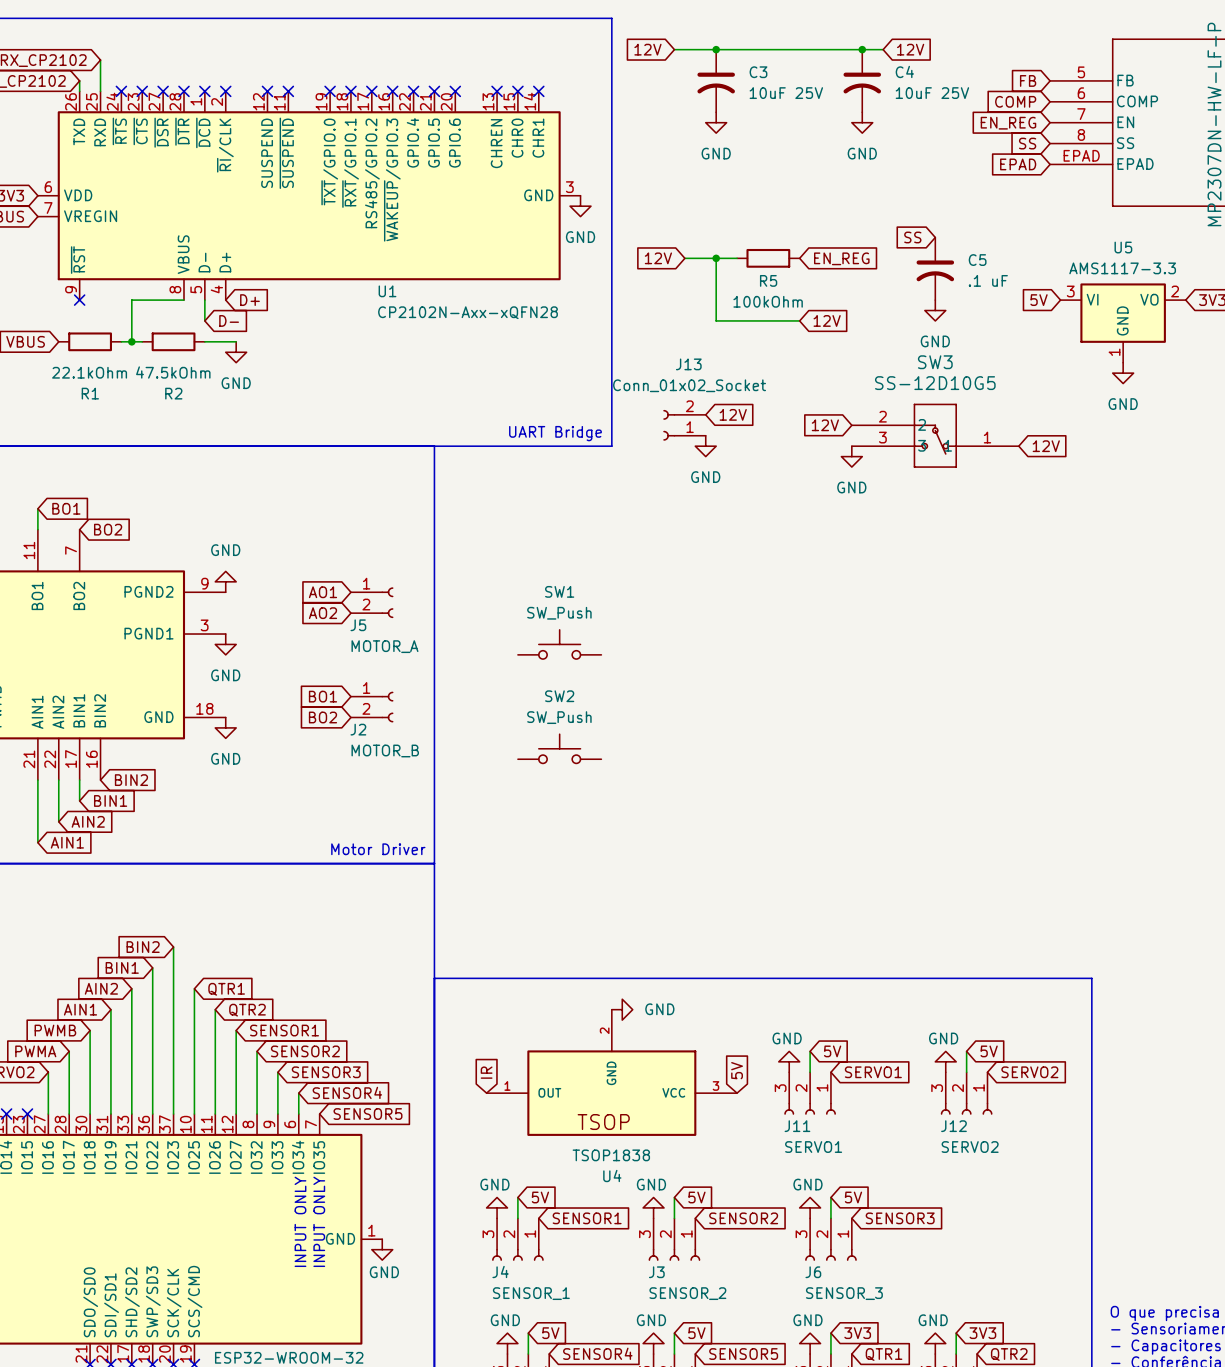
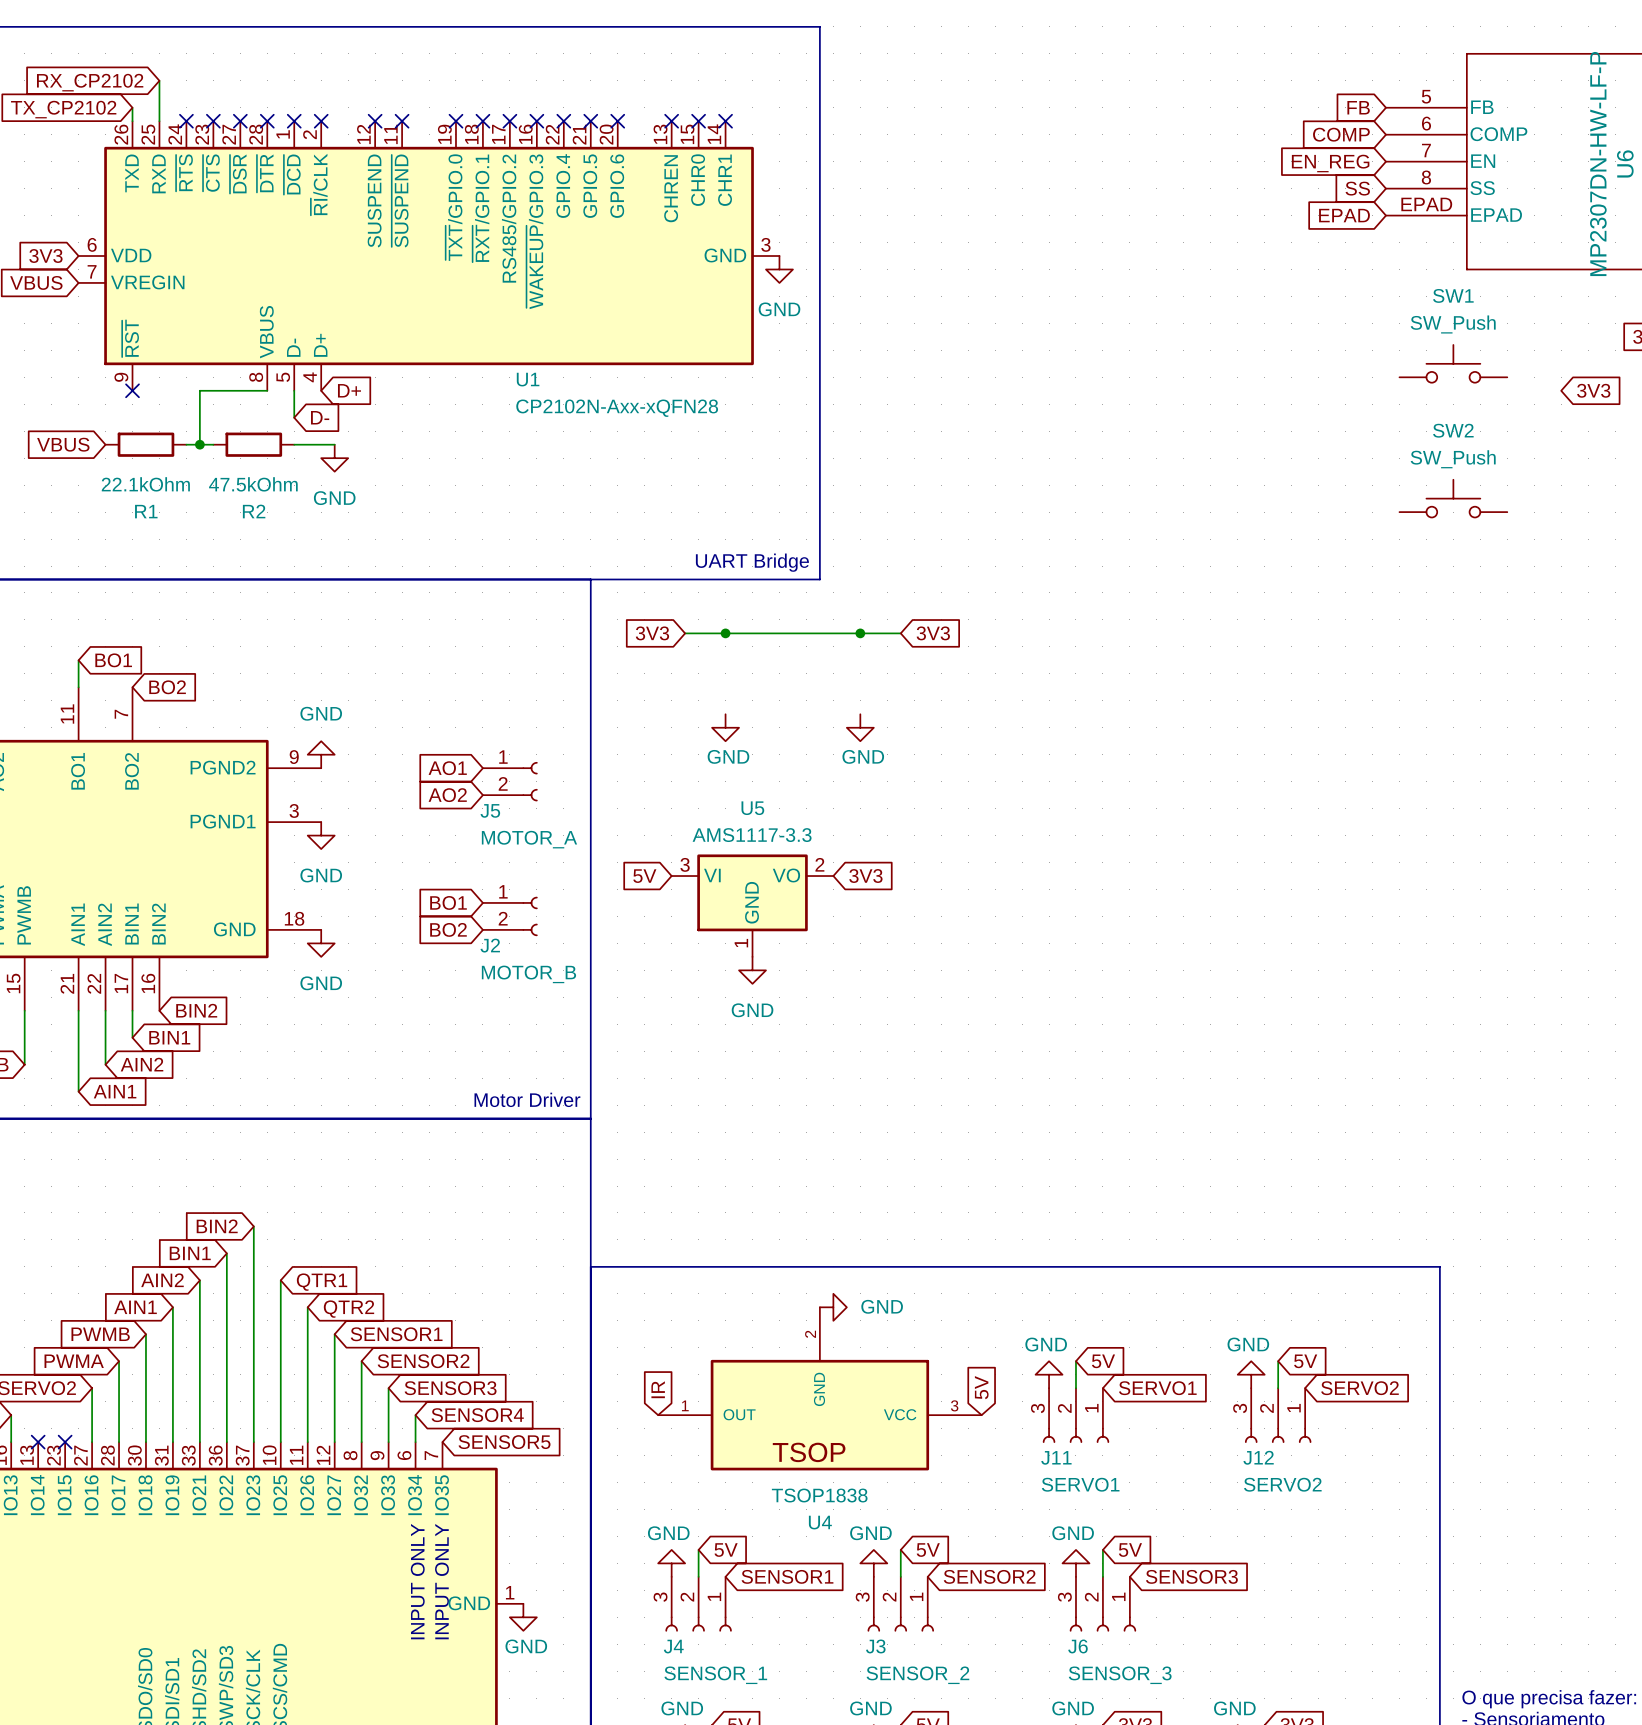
global label: 12V (647, 49) -> none
wire: (674, 49) (883, 49) -> none
junction: (716, 49) -> none
junction: (862, 49) -> none
global label: 12V (910, 49) -> none
C3: 10uF 25V (716, 80) -> none
C4: 10uF 25V (862, 80) -> none
power symbol: GND (716, 122) -> none
power symbol: GND (862, 122) -> none
global label: SS (912, 237) -> none
global label: 12V (658, 258) -> none
wire: (684, 258) (737, 258) -> none
wire: (716, 258) (716, 320) (799, 320) -> none
junction: (716, 258) -> none
R5: 100kOhm (768, 258) -> none
global label: EN_REG (841, 258) -> none
C5: .1 uF (935, 268) -> none
global label: 5V (1039, 300) -> none
power symbol: GND (935, 310) -> none
global label: 12V (827, 320) -> none
U5 position: (1123, 323) -> (752, 905)
power symbol: GND (1123, 373) -> none
global label: 12V (733, 414) -> none
J13: Conn_01x02_Socket (684, 425) -> none
global label: 12V (825, 425) -> none
SW3: SS-12D10G5 (935, 435) -> none
power symbol: GND (705, 446) -> none
global label: 12V (1046, 446) -> none
power symbol: GND (851, 456) -> none
global label: none -> 3V3 (652, 633)
wire: none -> (685, 633) (900, 633)
junction: none -> (725, 633)
junction: none -> (860, 633)
global label: none -> 3V3 (933, 633)
power symbol: none -> GND (725, 727)
power symbol: none -> GND (860, 727)
SW1 position: (559, 644) -> (1453, 363)
global label: none -> 5V (644, 876)
global label: none -> 3V3 (865, 876)
SW2 position: (559, 748) -> (1453, 498)
power symbol: none -> GND (752, 970)

